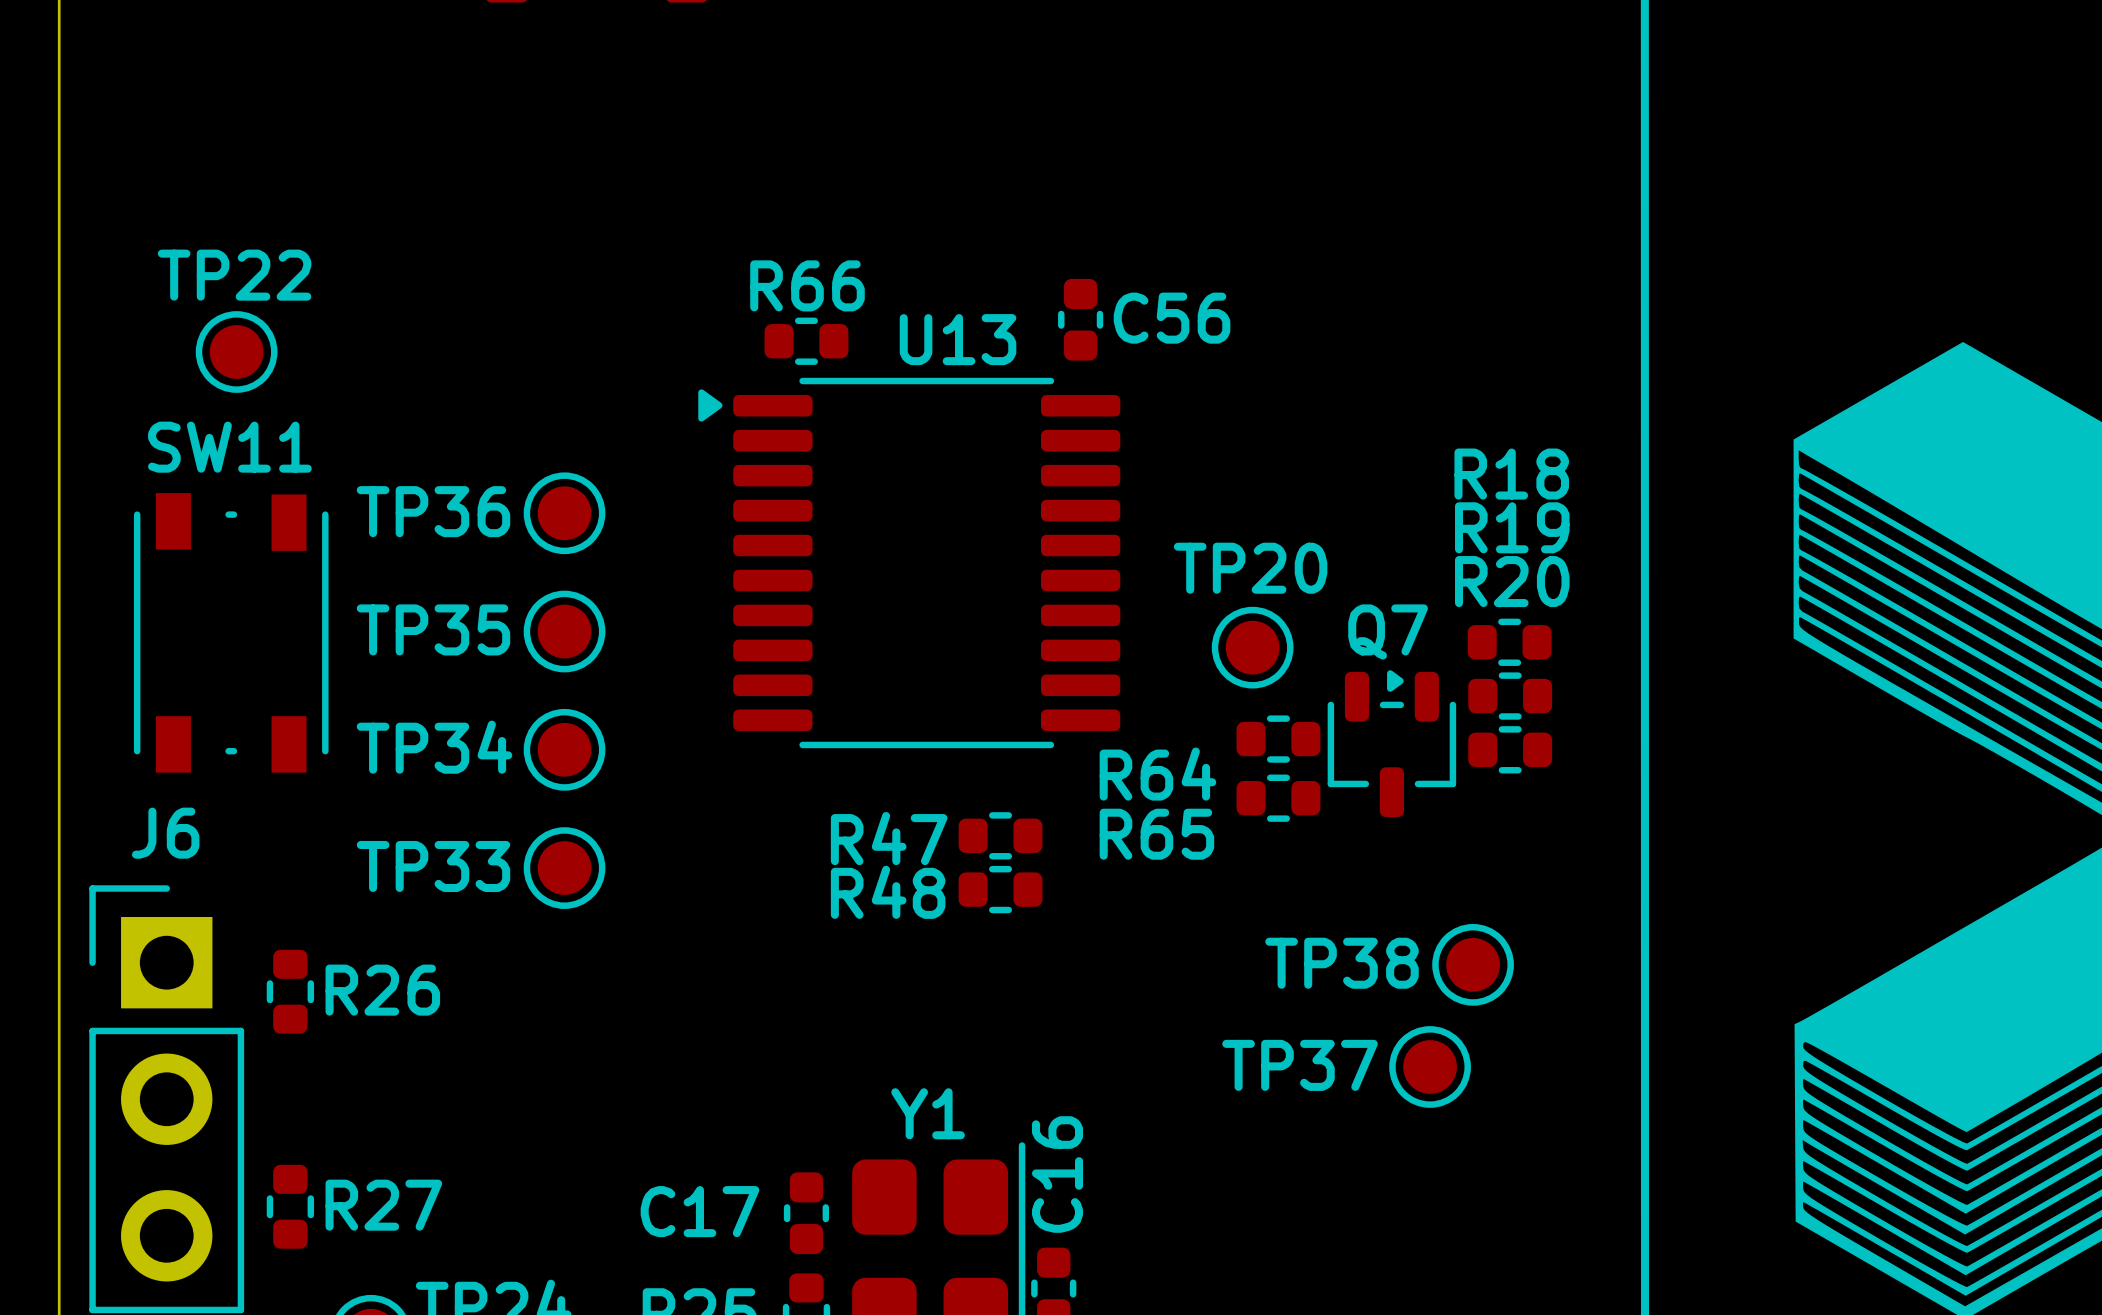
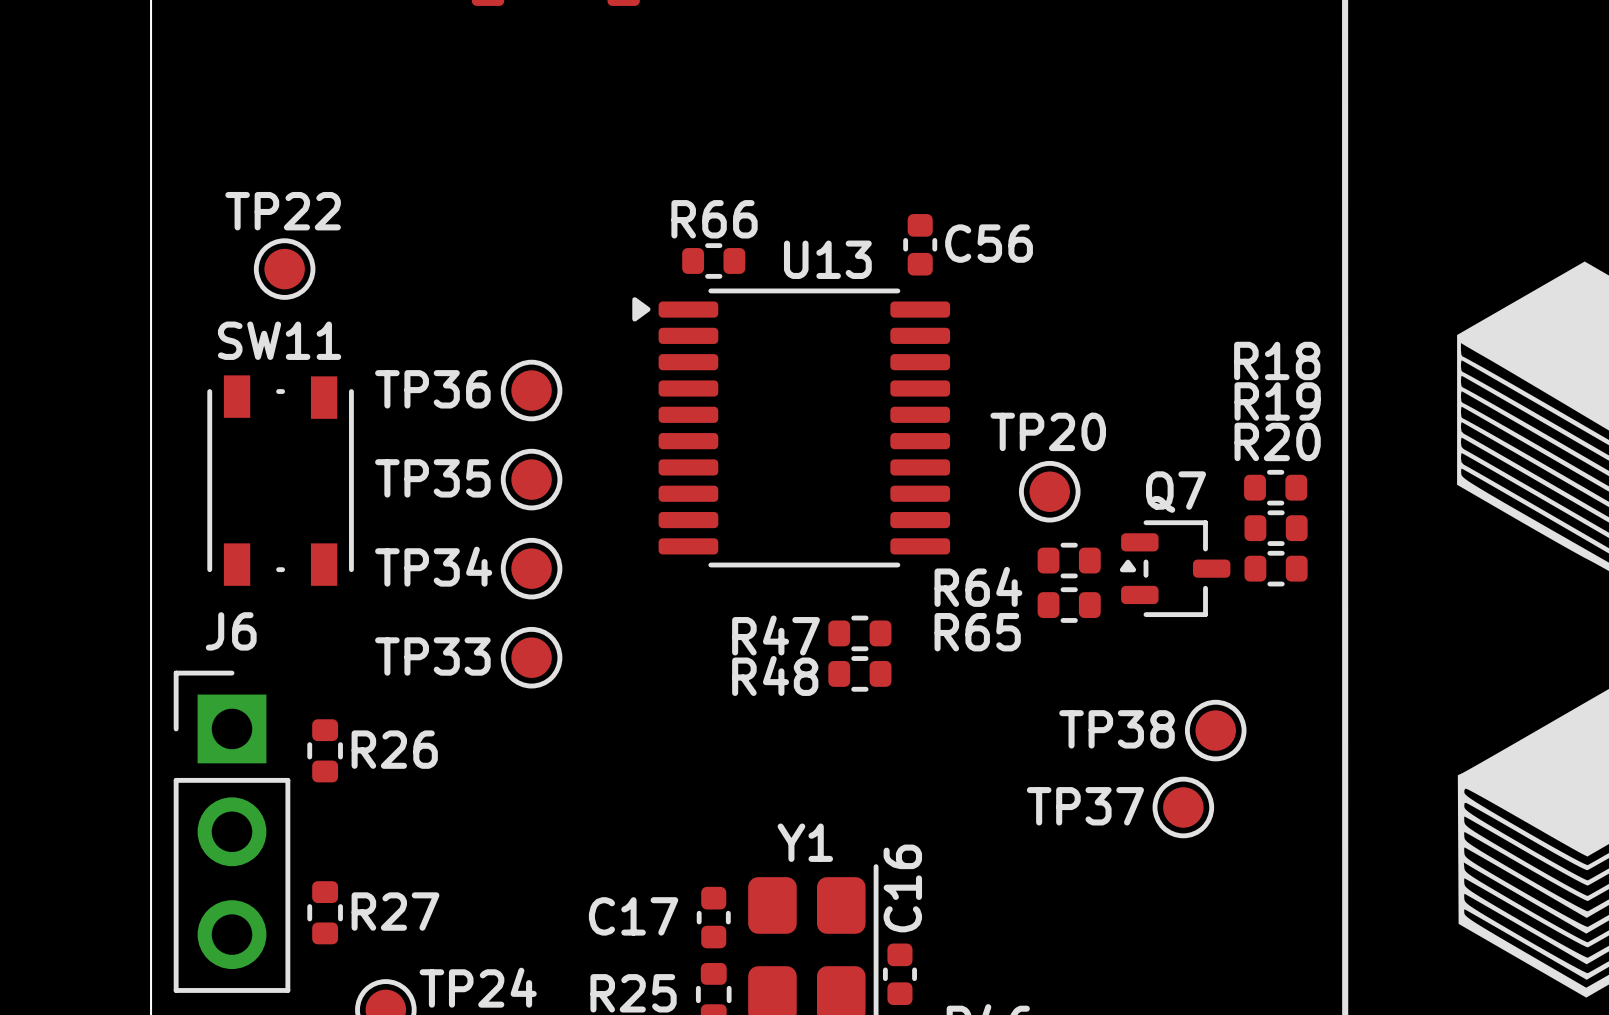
R18 position: (1509, 642) -> (1275, 487)
R19 position: (1510, 696) -> (1276, 528)
Q7 rotation: 0° (1391, 743) -> 90° counterclockwise (1175, 568)
R20 position: (1510, 749) -> (1276, 568)

